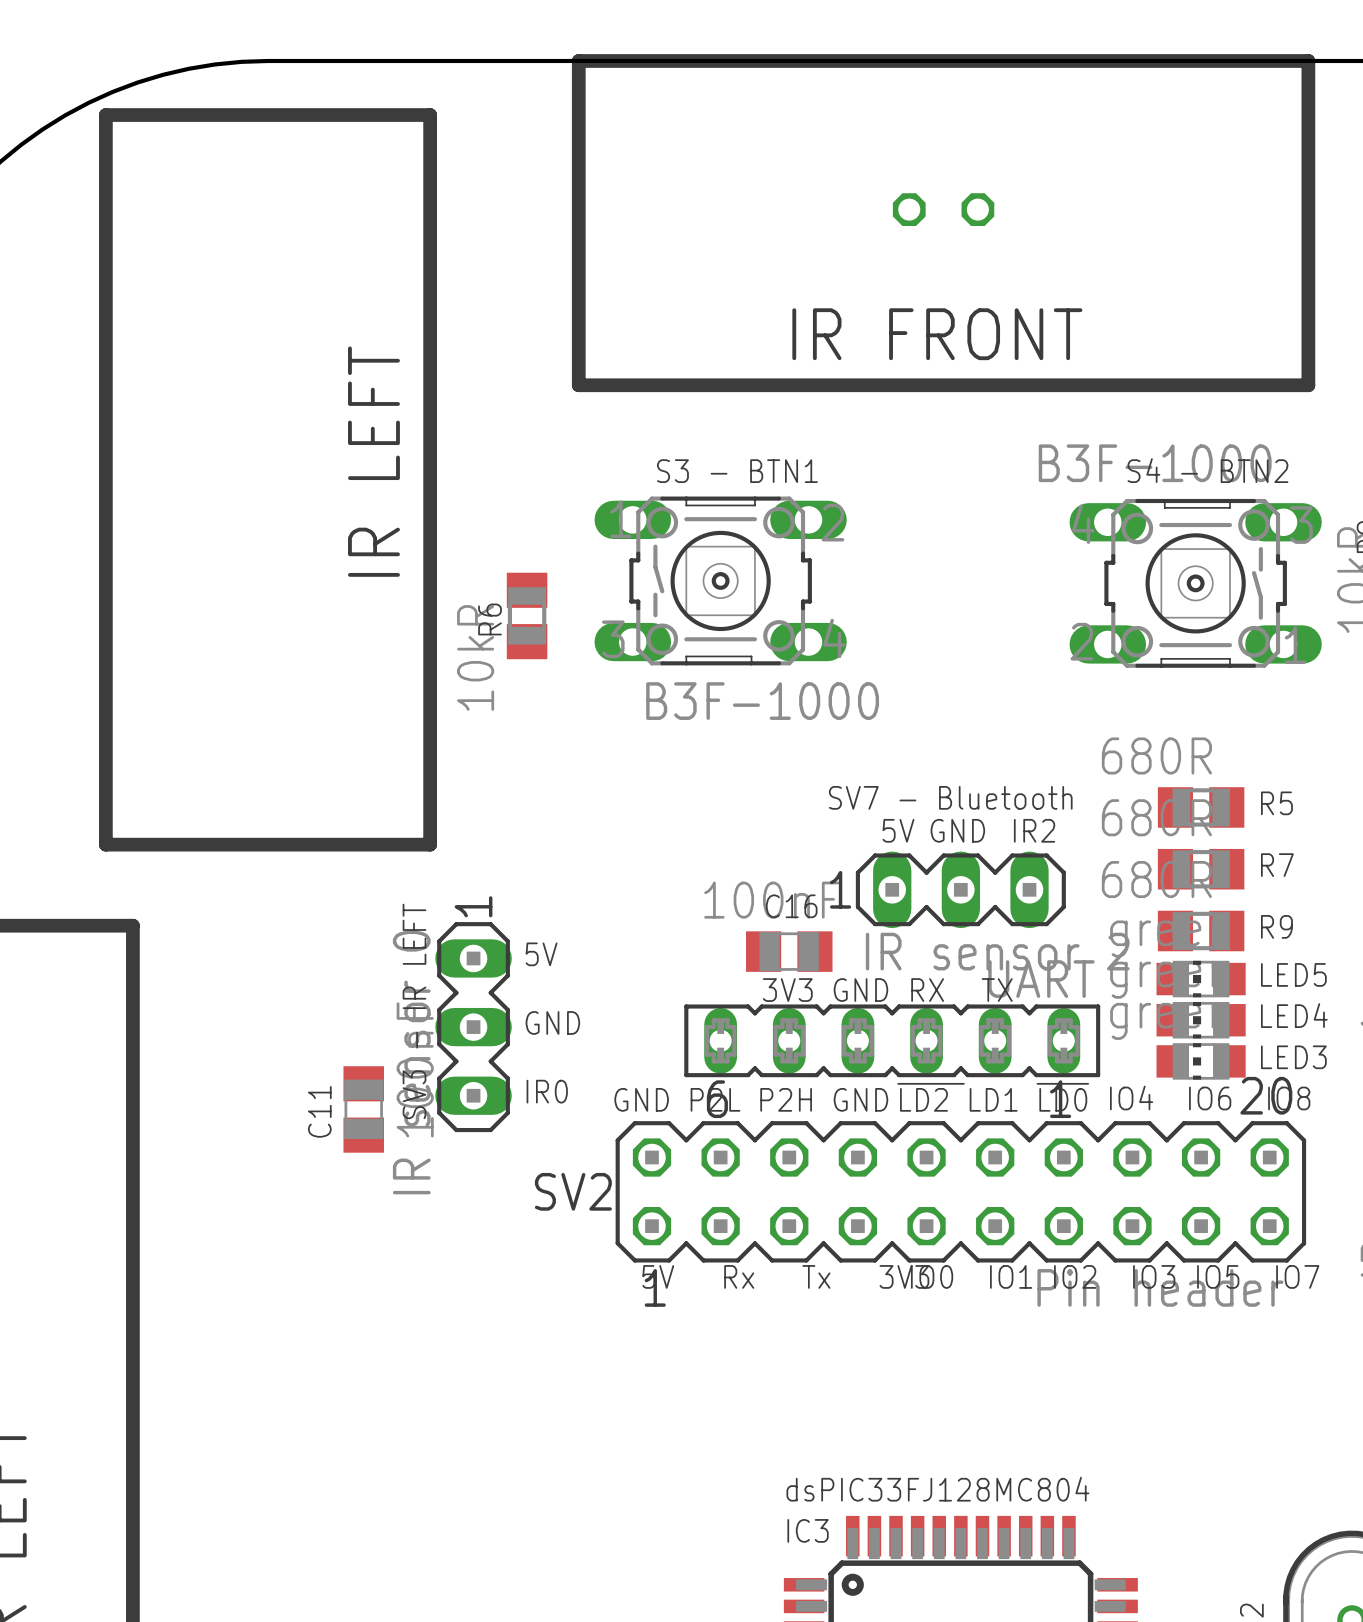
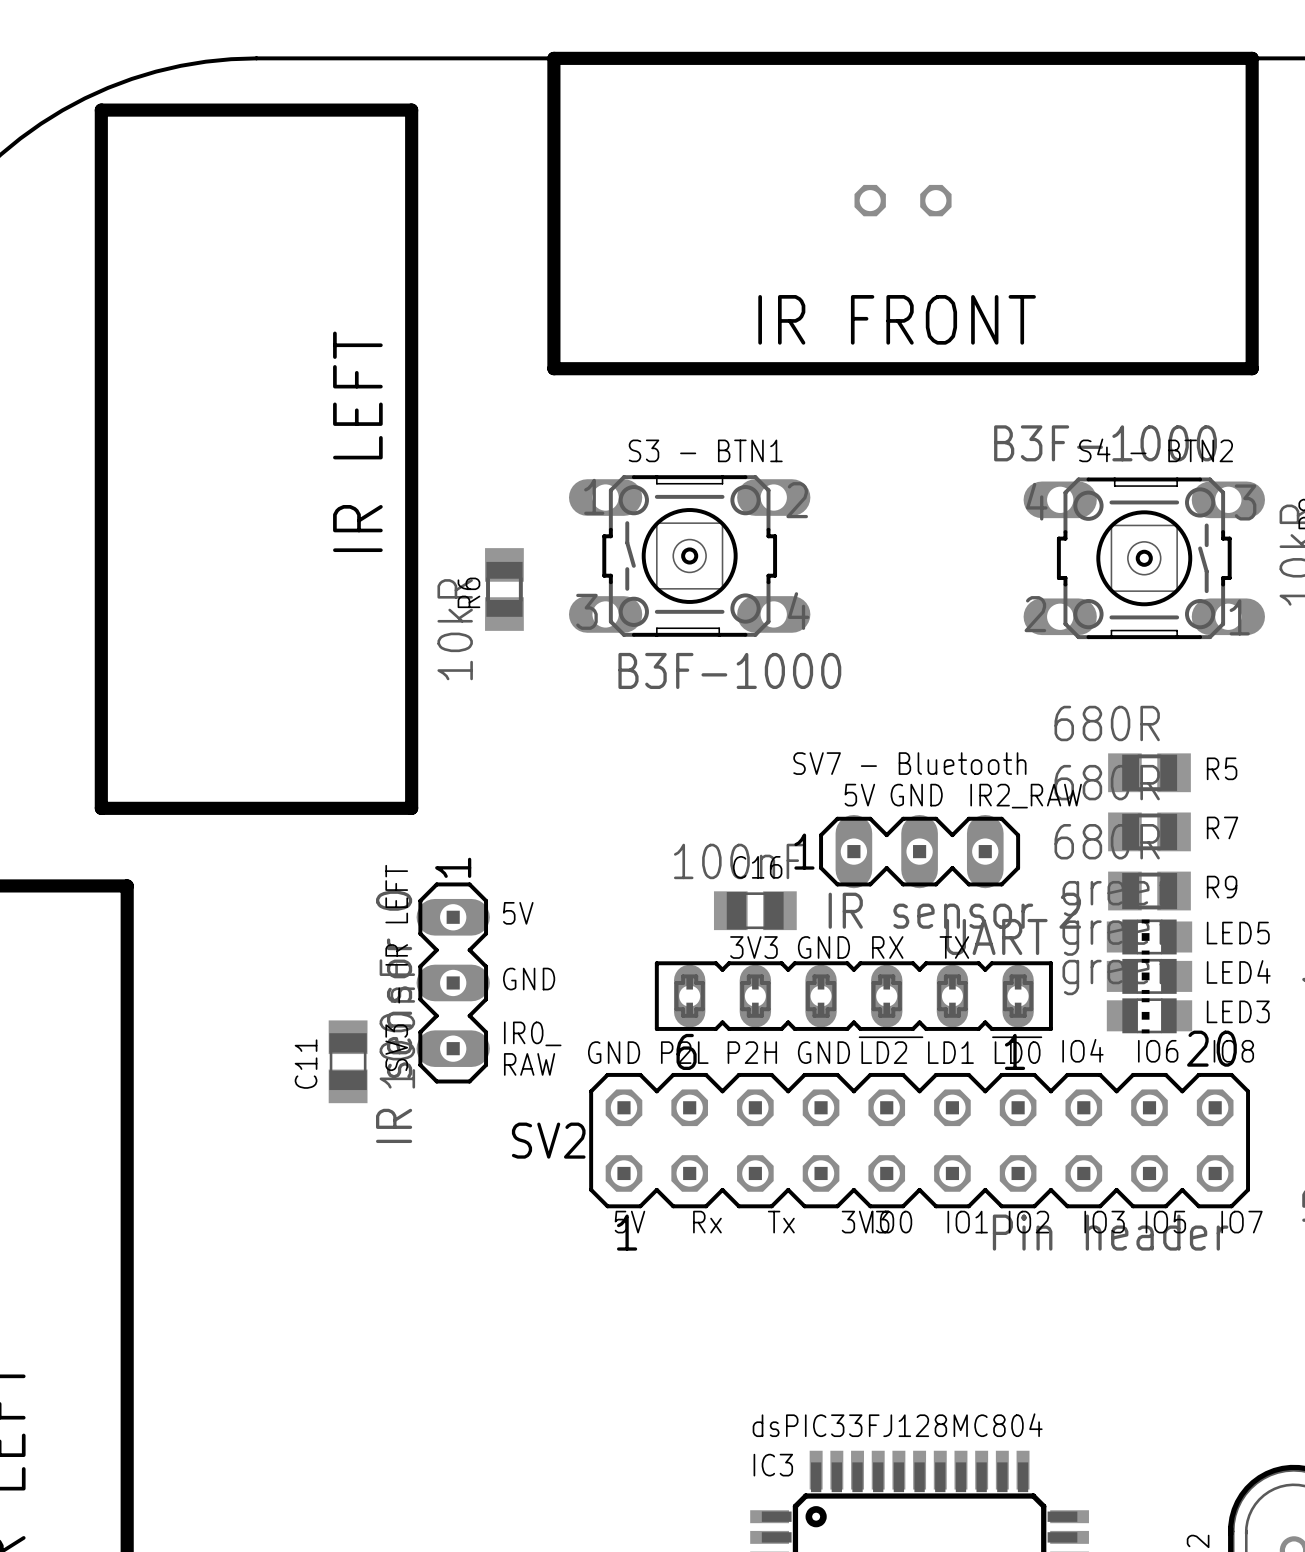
text: IR2 (1034, 830) -> IR2_RAW (1026, 796)
text: IR0 (547, 1091) -> IR0_ (532, 1033)
text: none -> RAW (529, 1064)

